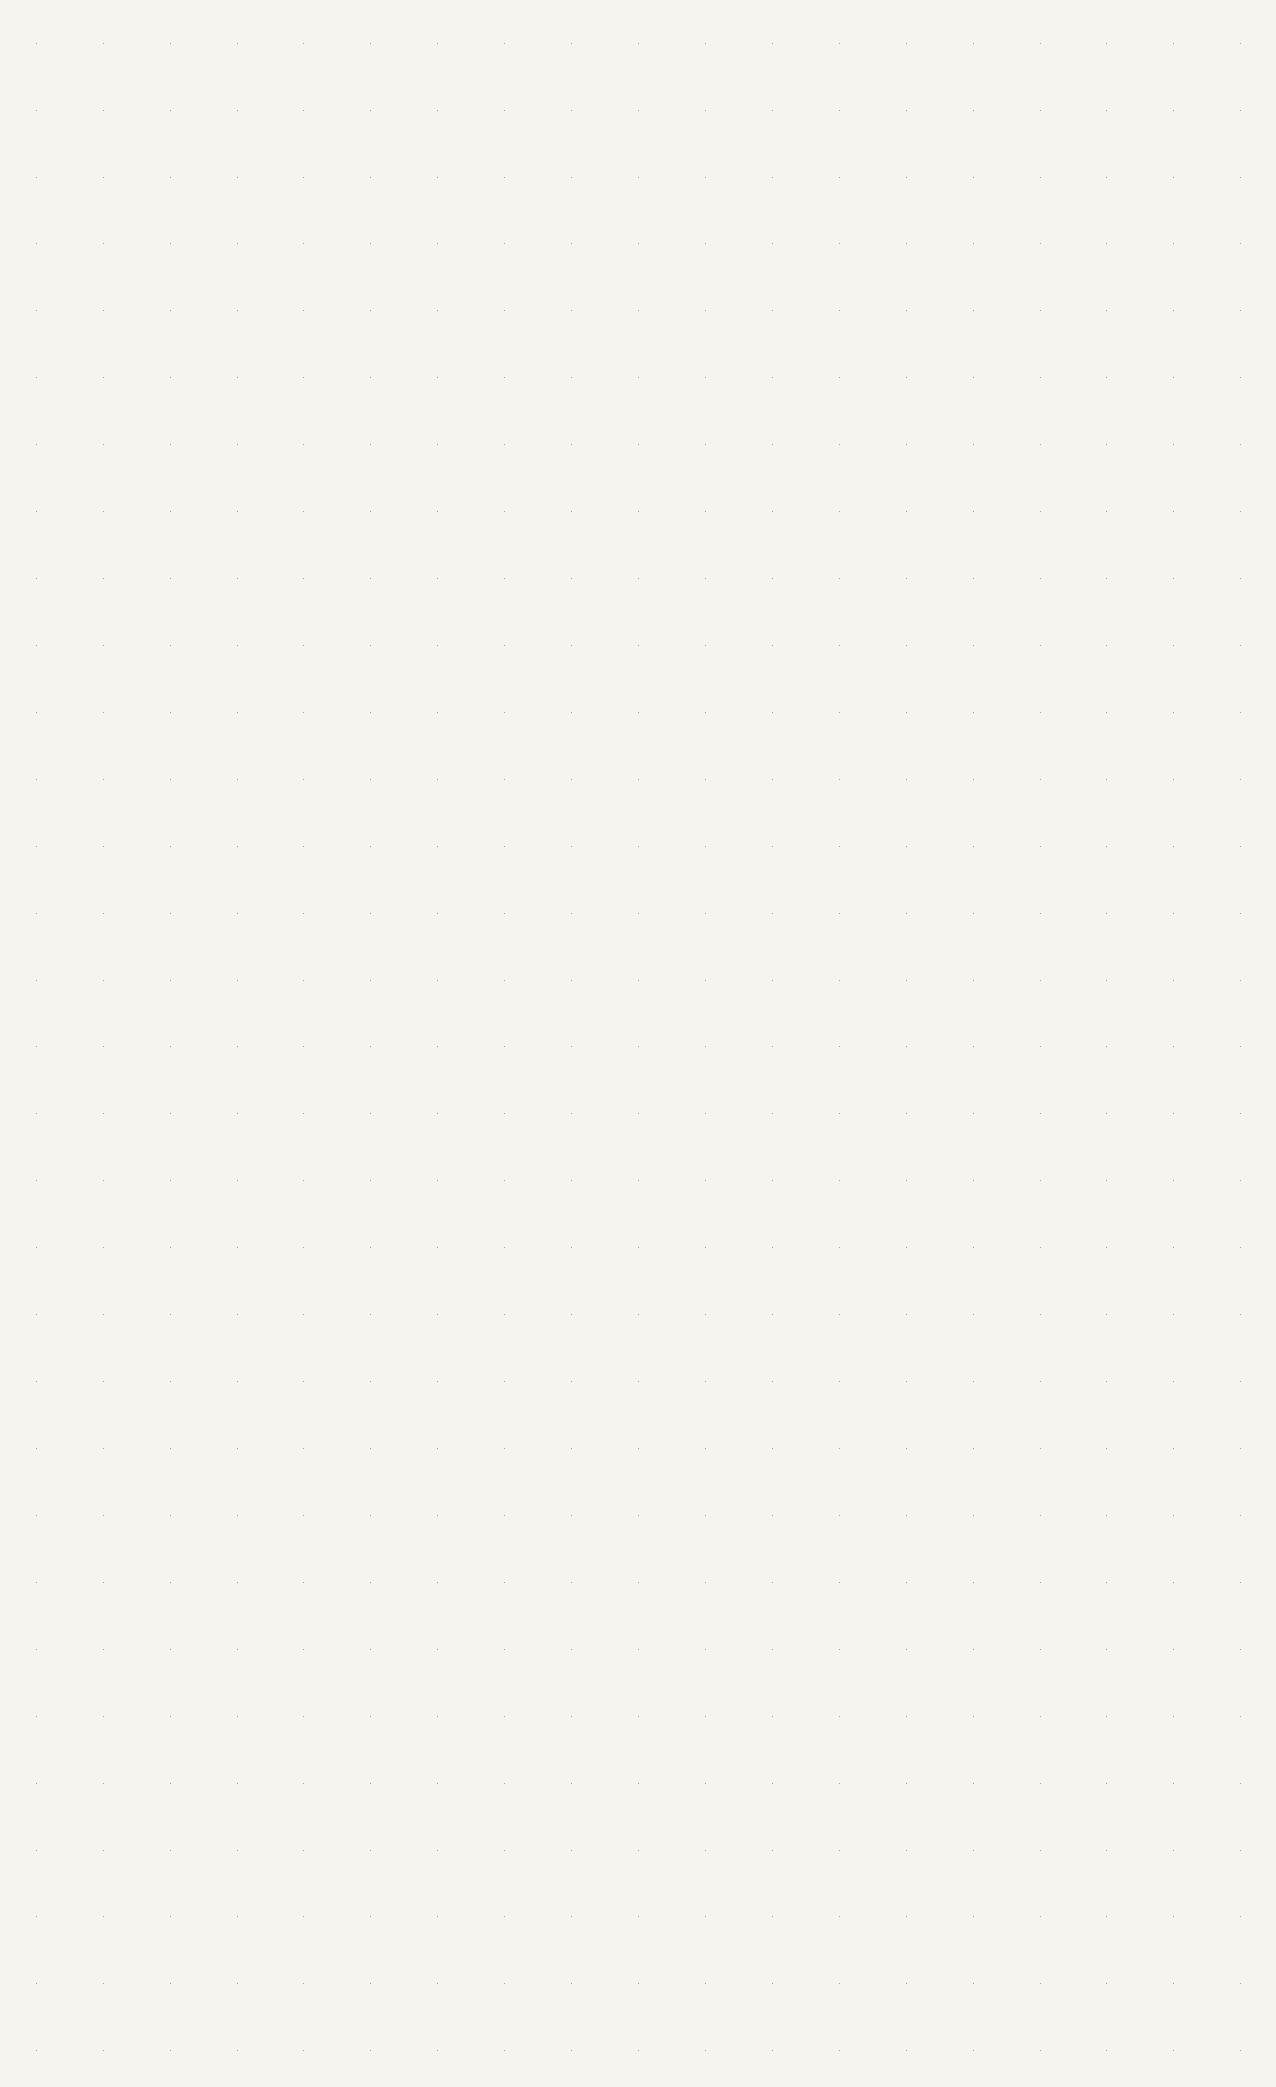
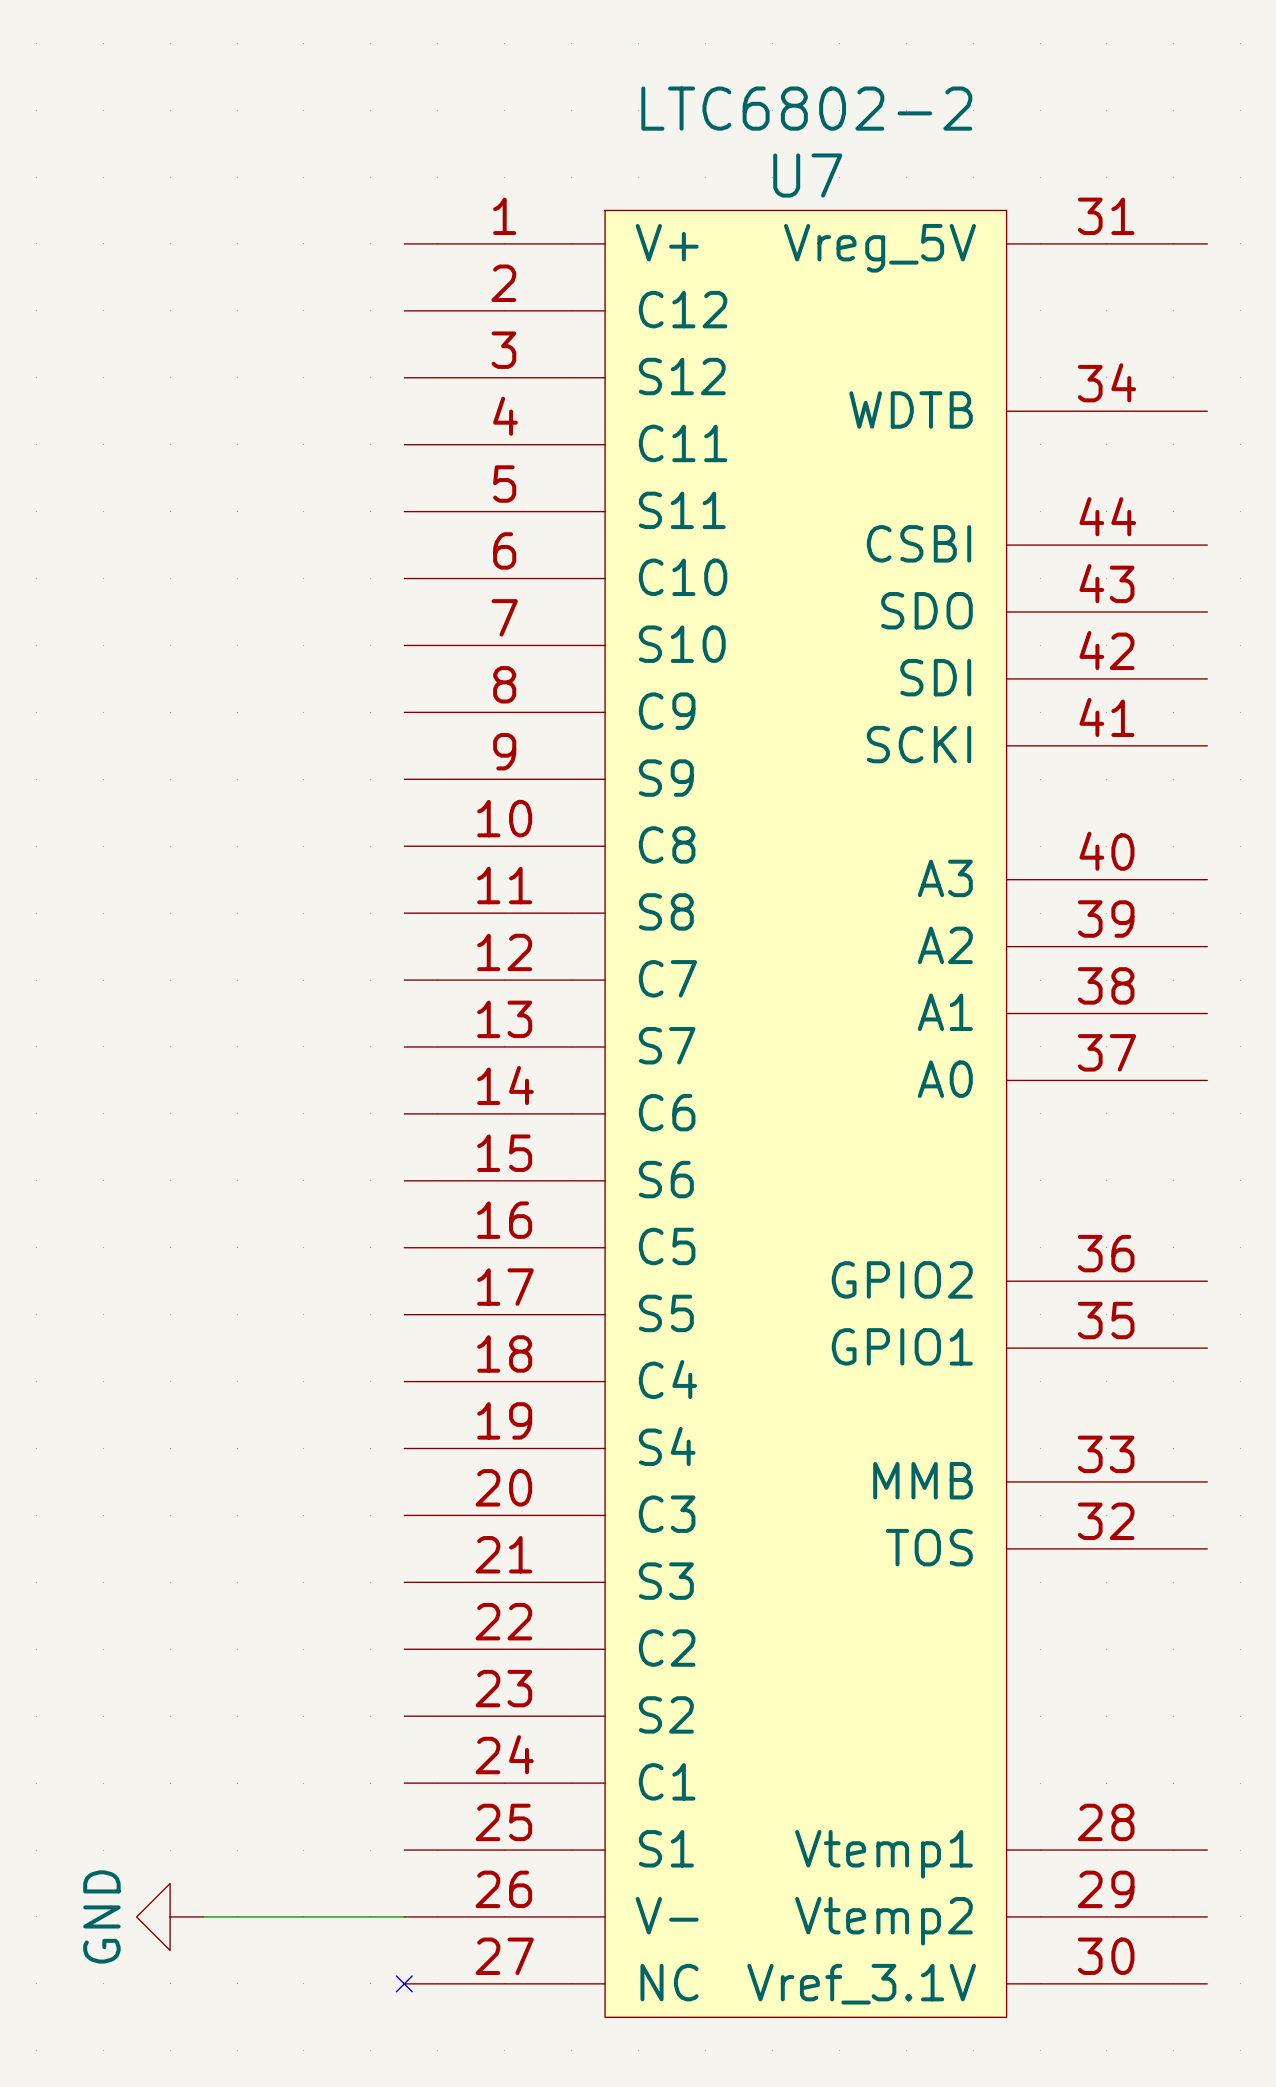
U7: none -> LTC6802-2 (801, 1113)
power symbol: none -> GND (170, 1916)
wire: none -> (203, 1916) (404, 1916)

